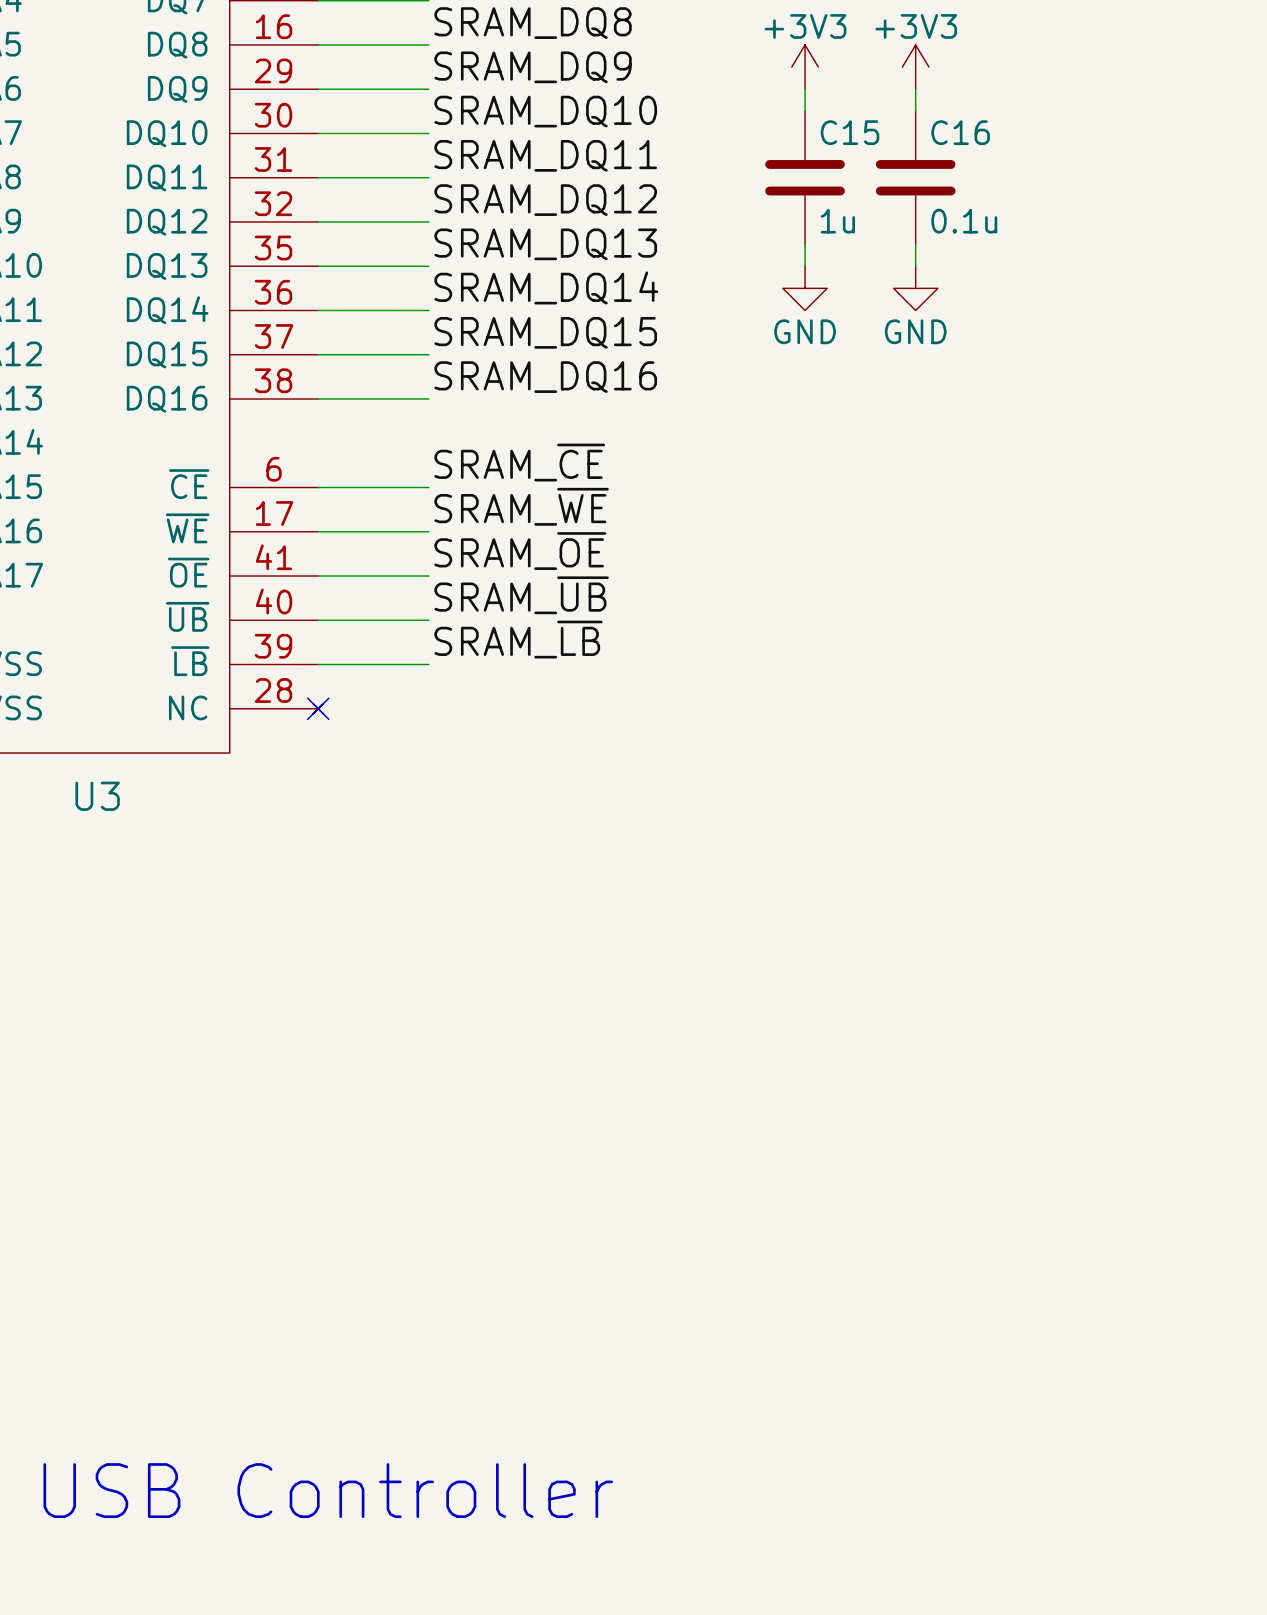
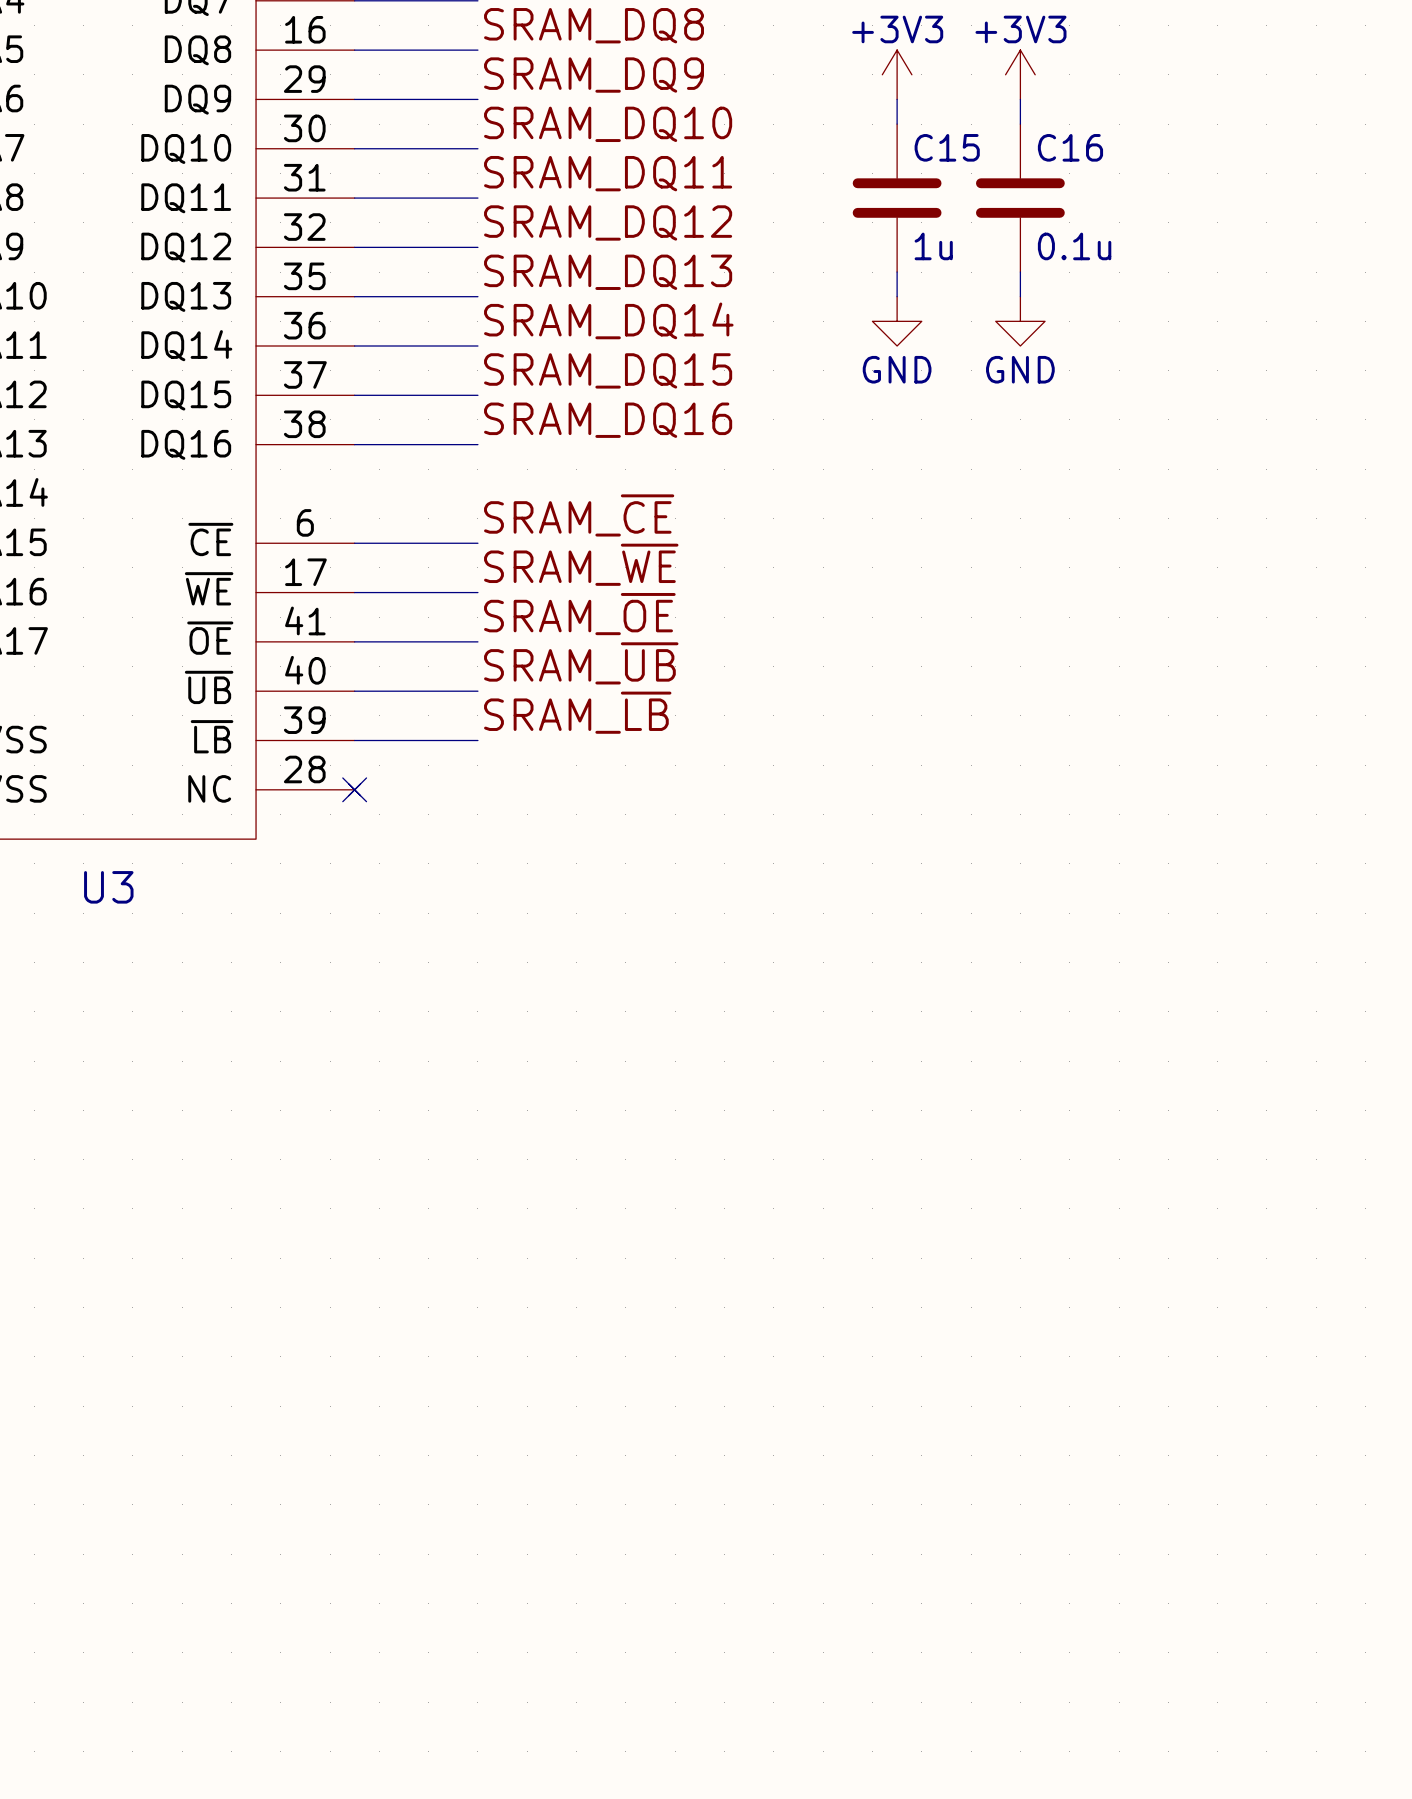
text: USB Controller (328, 1490) -> none

